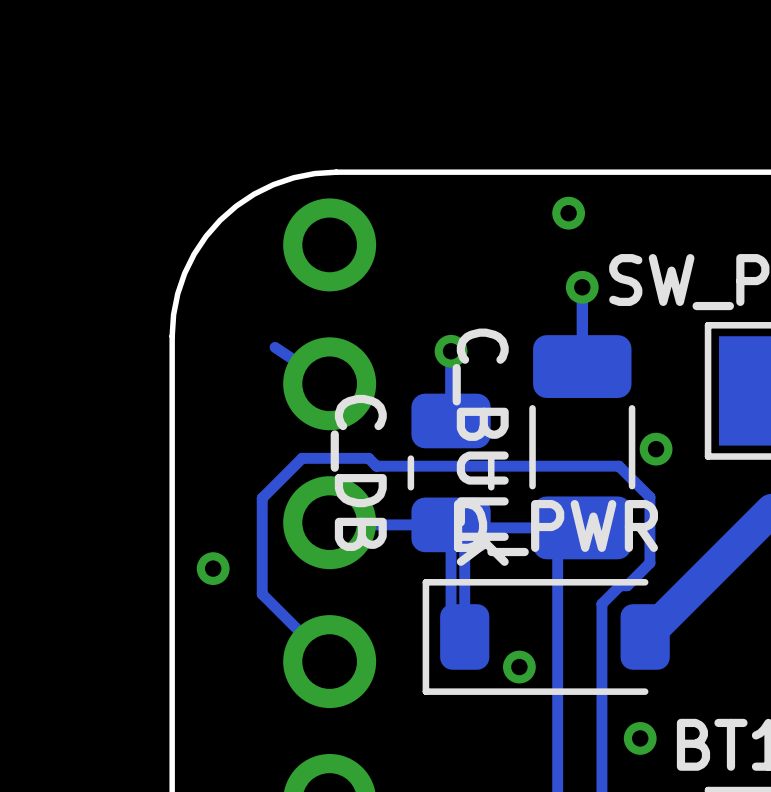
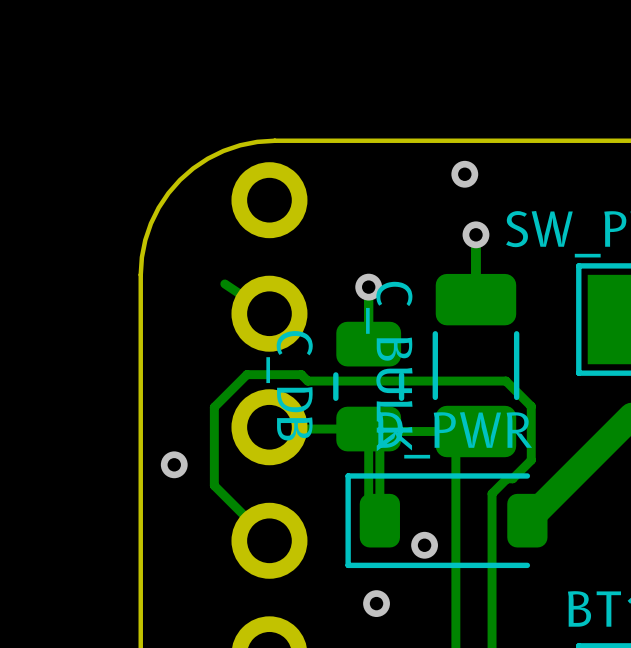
via: (656, 449) -> none
via: none -> (376, 603)
via: (640, 738) -> none

